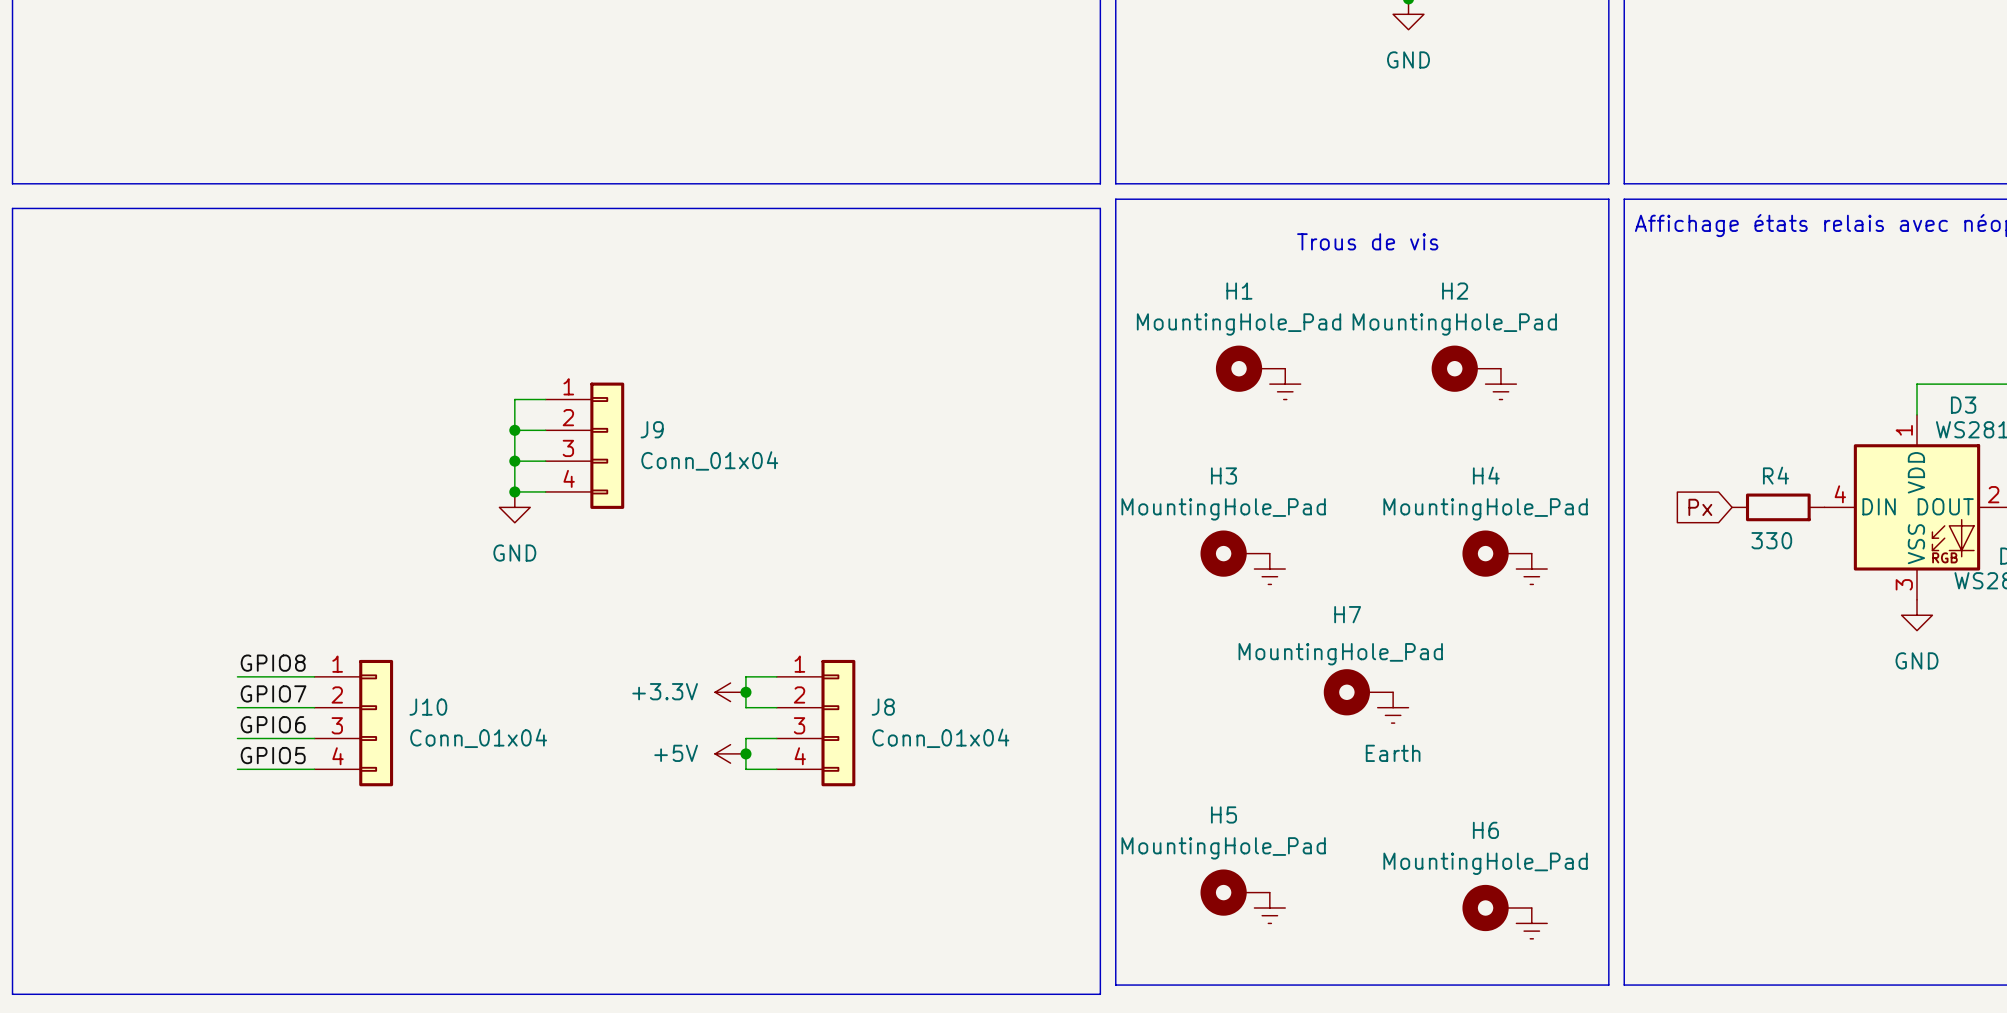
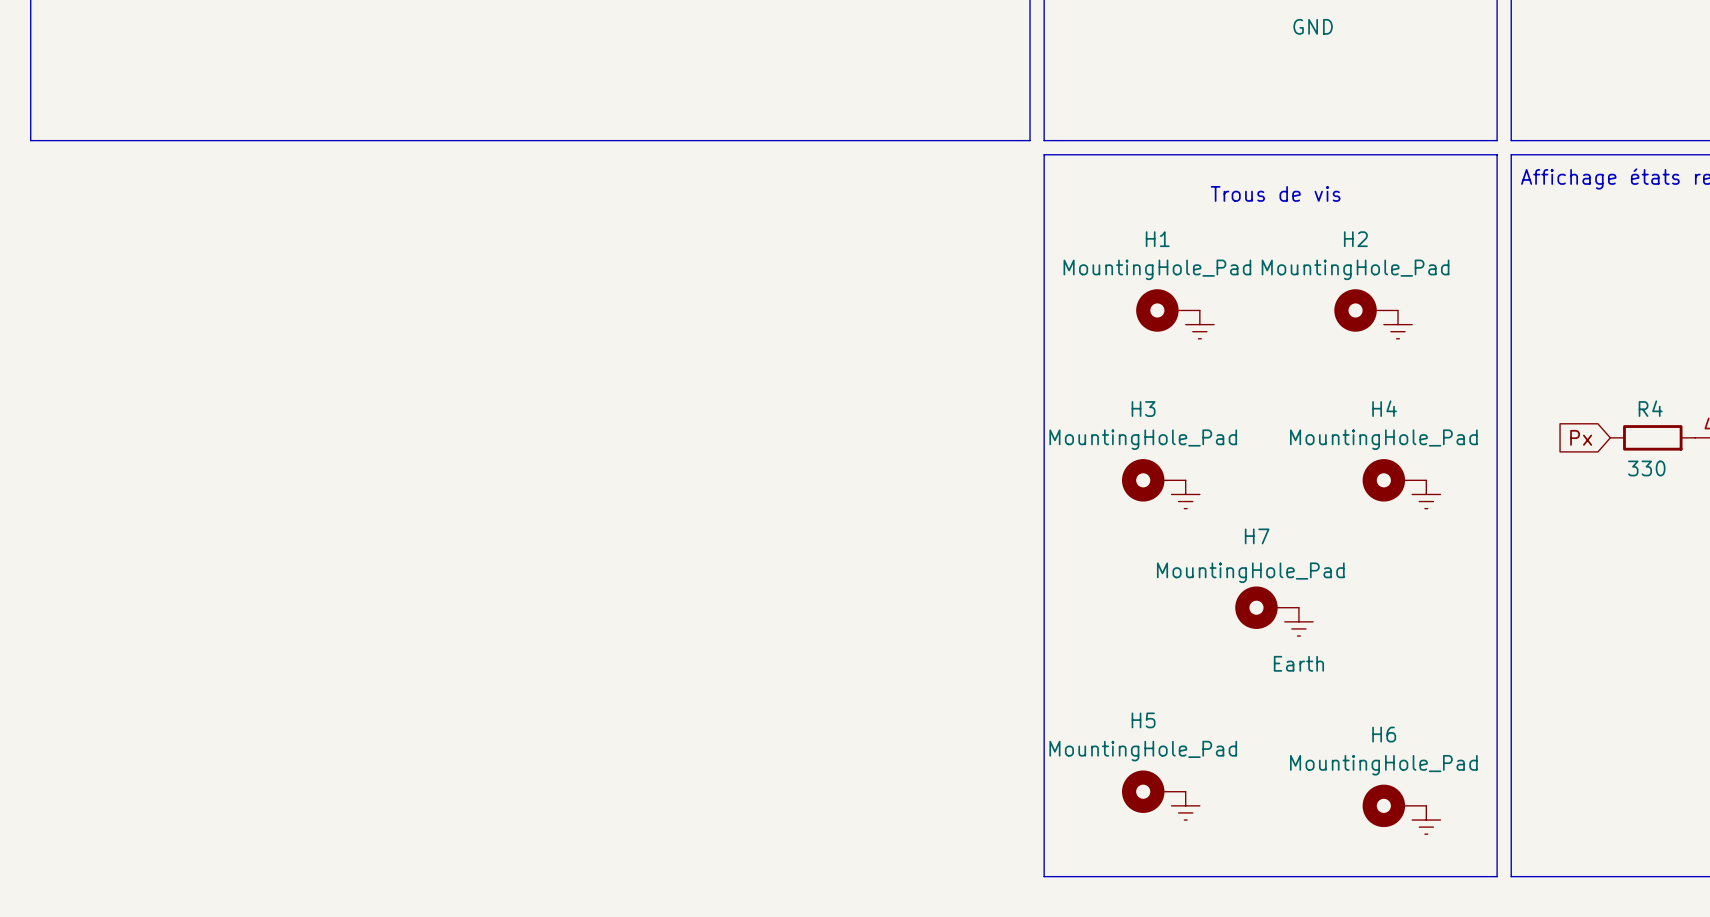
line: (12, 208) (1100, 208) (1100, 994) (12, 994) (12, 208) -> none
wire: (545, 399) (514, 399) (514, 491) (545, 491) -> none
wire: (514, 430) (545, 430) -> none
junction: (514, 430) -> none
J9: Conn_01x04 (584, 445) -> none
wire: (514, 461) (545, 461) -> none
junction: (514, 461) -> none
junction: (514, 491) -> none
power symbol: GND (514, 507) -> none
label: GPIO8 (273, 663) -> none
wire: (237, 676) (314, 676) -> none
wire: (776, 676) (745, 676) (745, 707) (776, 707) -> none
power symbol: +3.3V (730, 692) -> none
junction: (745, 692) -> none
label: GPIO7 (273, 693) -> none
wire: (237, 707) (314, 707) -> none
J10: Conn_01x04 (353, 723) -> none
J8: Conn_01x04 (816, 723) -> none
label: GPIO6 (273, 724) -> none
wire: (237, 738) (314, 738) -> none
wire: (776, 738) (745, 738) (745, 769) (776, 769) -> none
power symbol: +5V (730, 753) -> none
junction: (745, 753) -> none
label: GPIO5 (273, 755) -> none
wire: (237, 769) (314, 769) -> none

